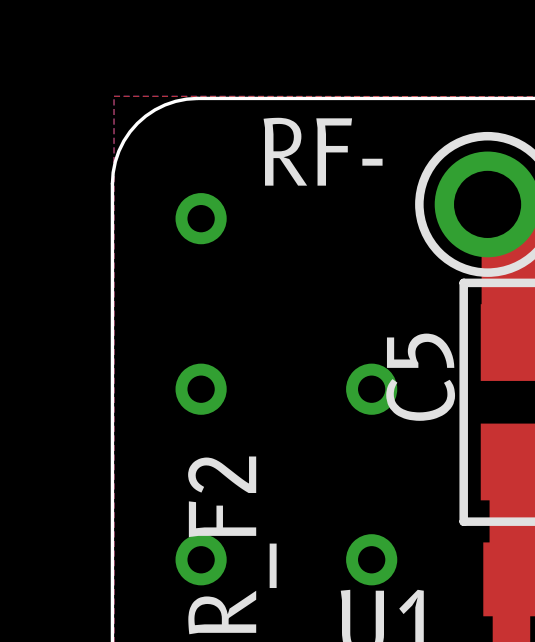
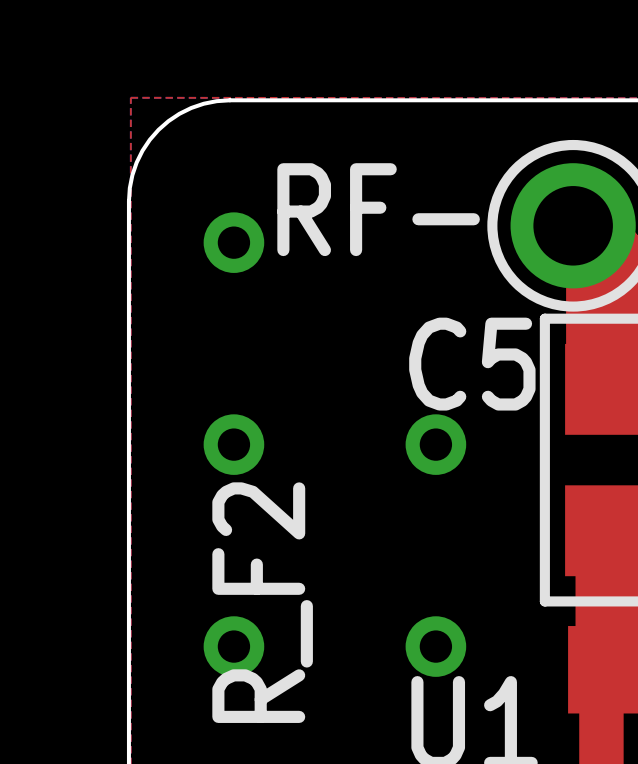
RF- name position: RF- (323, 151) -> RF- (378, 209)
C5 name rotation: 0° (420, 377) -> 90° clockwise (472, 364)

